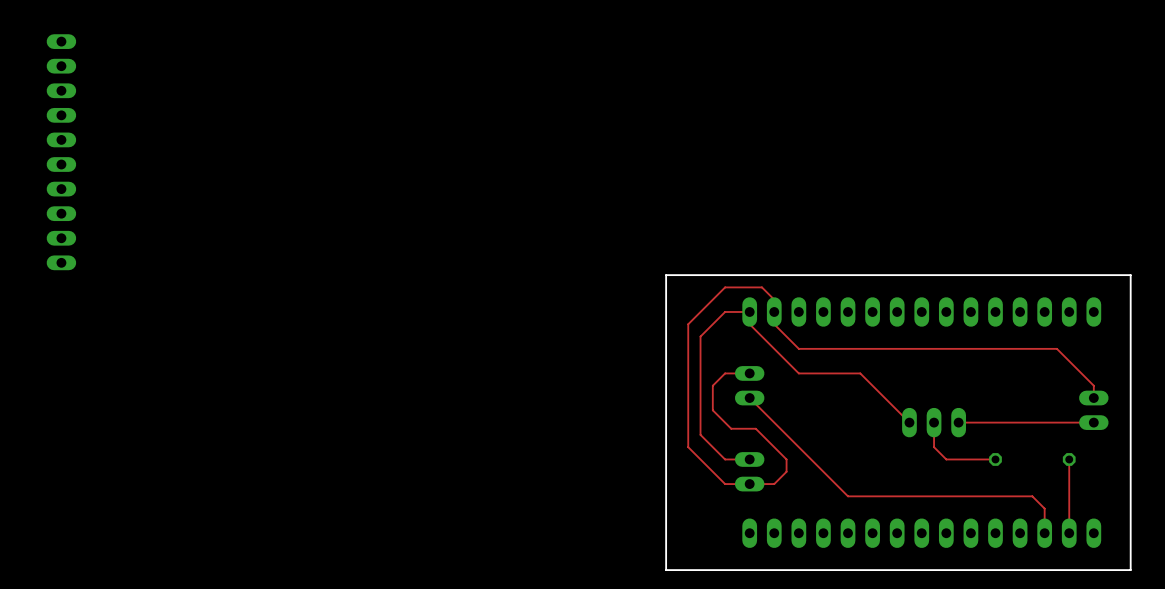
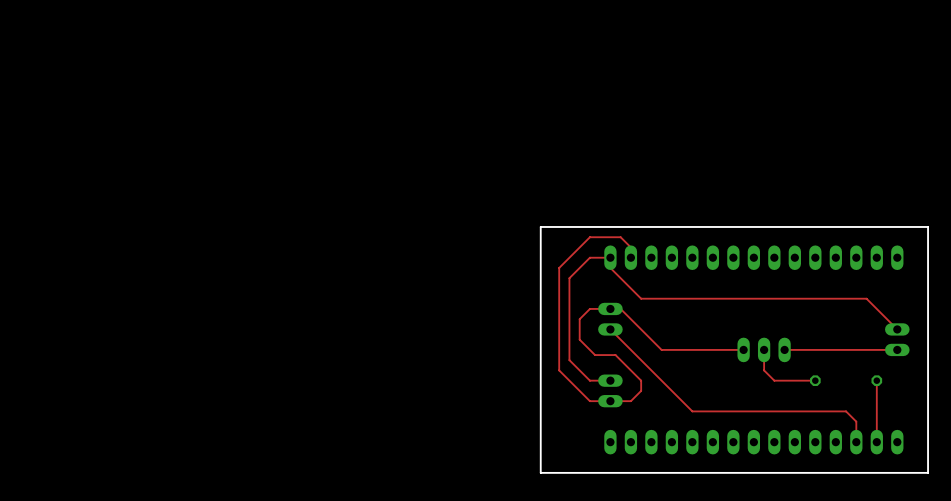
part: (61, 152) -> none
top track: (774, 311) (774, 324) (798, 348) (1056, 348) (1093, 385) (1093, 398) -> (641, 298) (866, 298) (897, 329)
top track: (786, 361) (798, 373) (860, 373) (909, 422) -> (610, 308) (620, 308) (661, 349) (743, 349)

